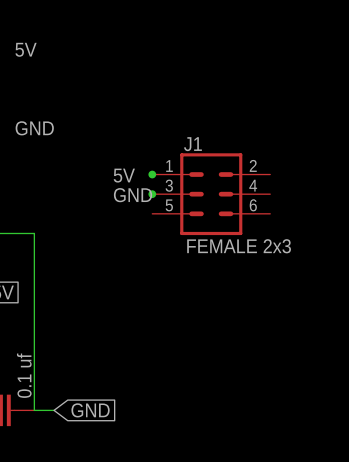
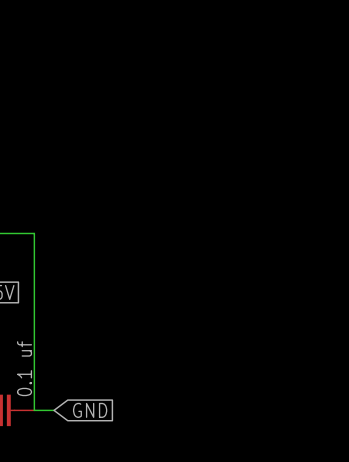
label: 5V (26, 49) -> none
label: GND (34, 128) -> none
junction: (152, 174) -> none
label: 5V (124, 175) -> none
junction: (152, 194) -> none
J1: FEMALE 2x3 (211, 194) -> none
label: GND (133, 195) -> none

